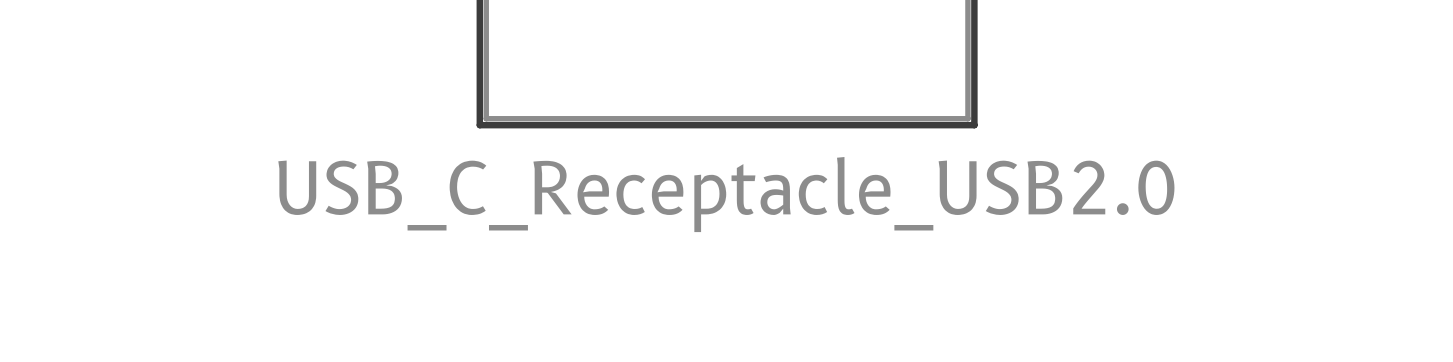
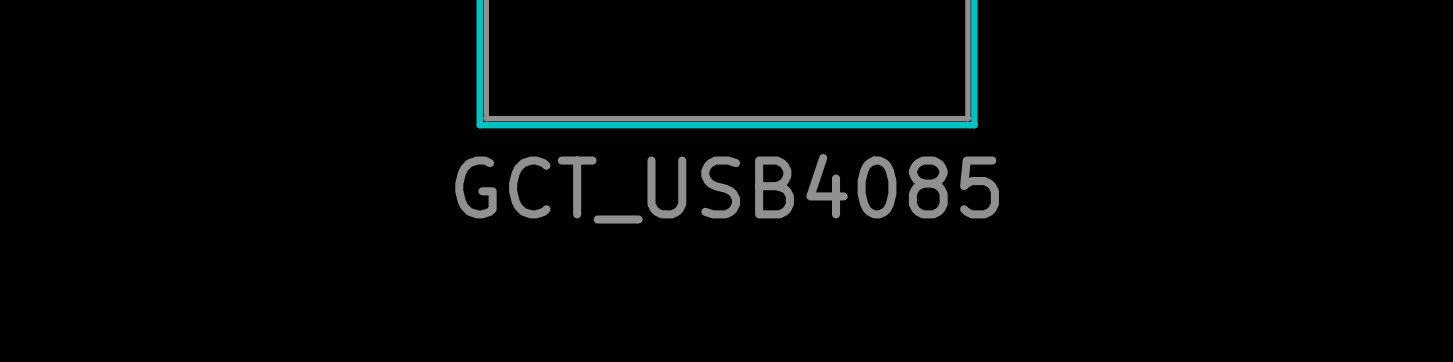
part value: USB_C_Receptacle_USB2.0 (726, 194) -> GCT_USB4085 (727, 188)

